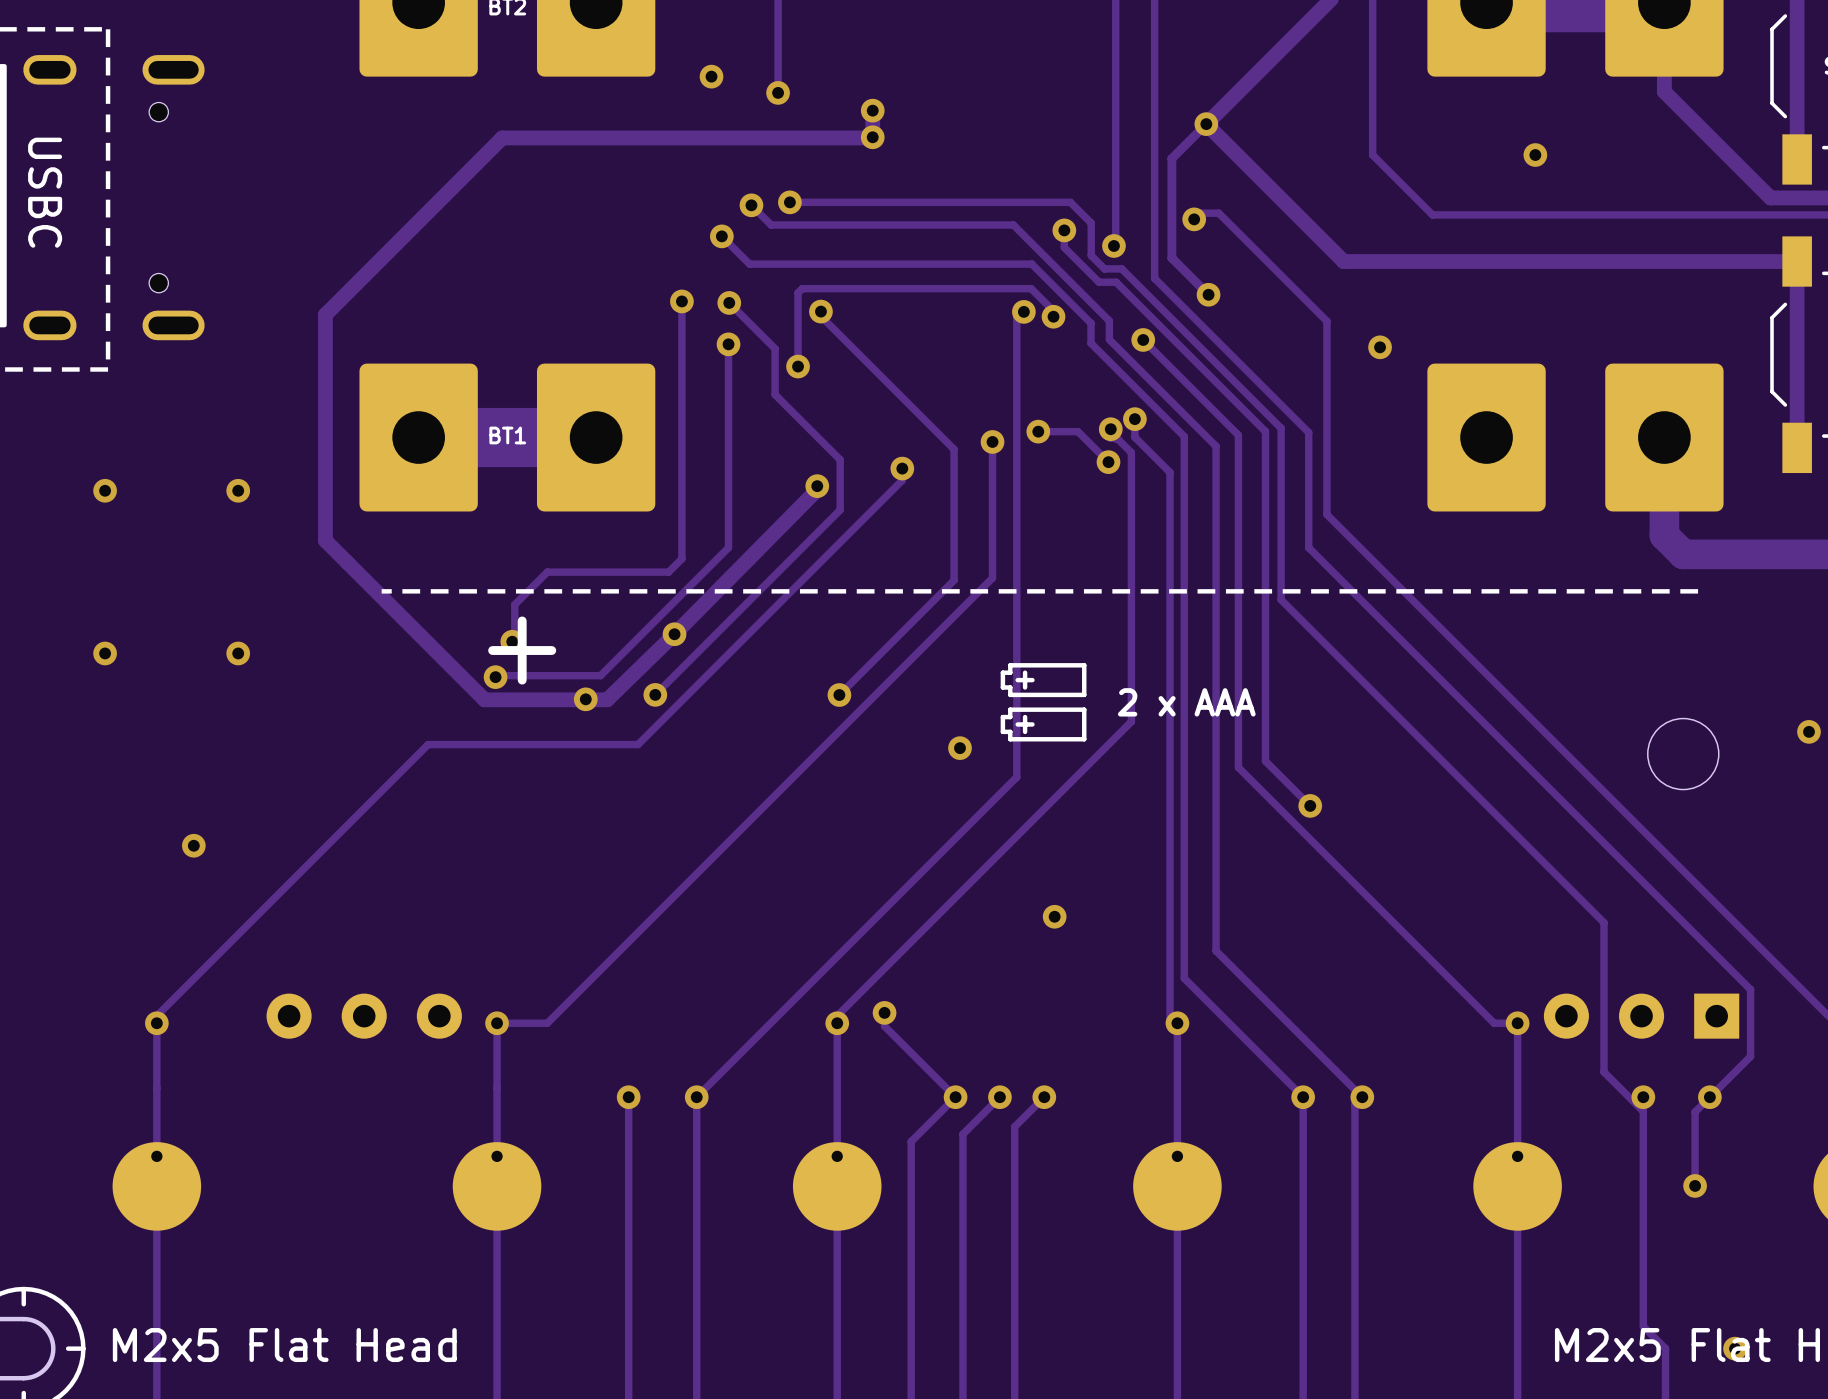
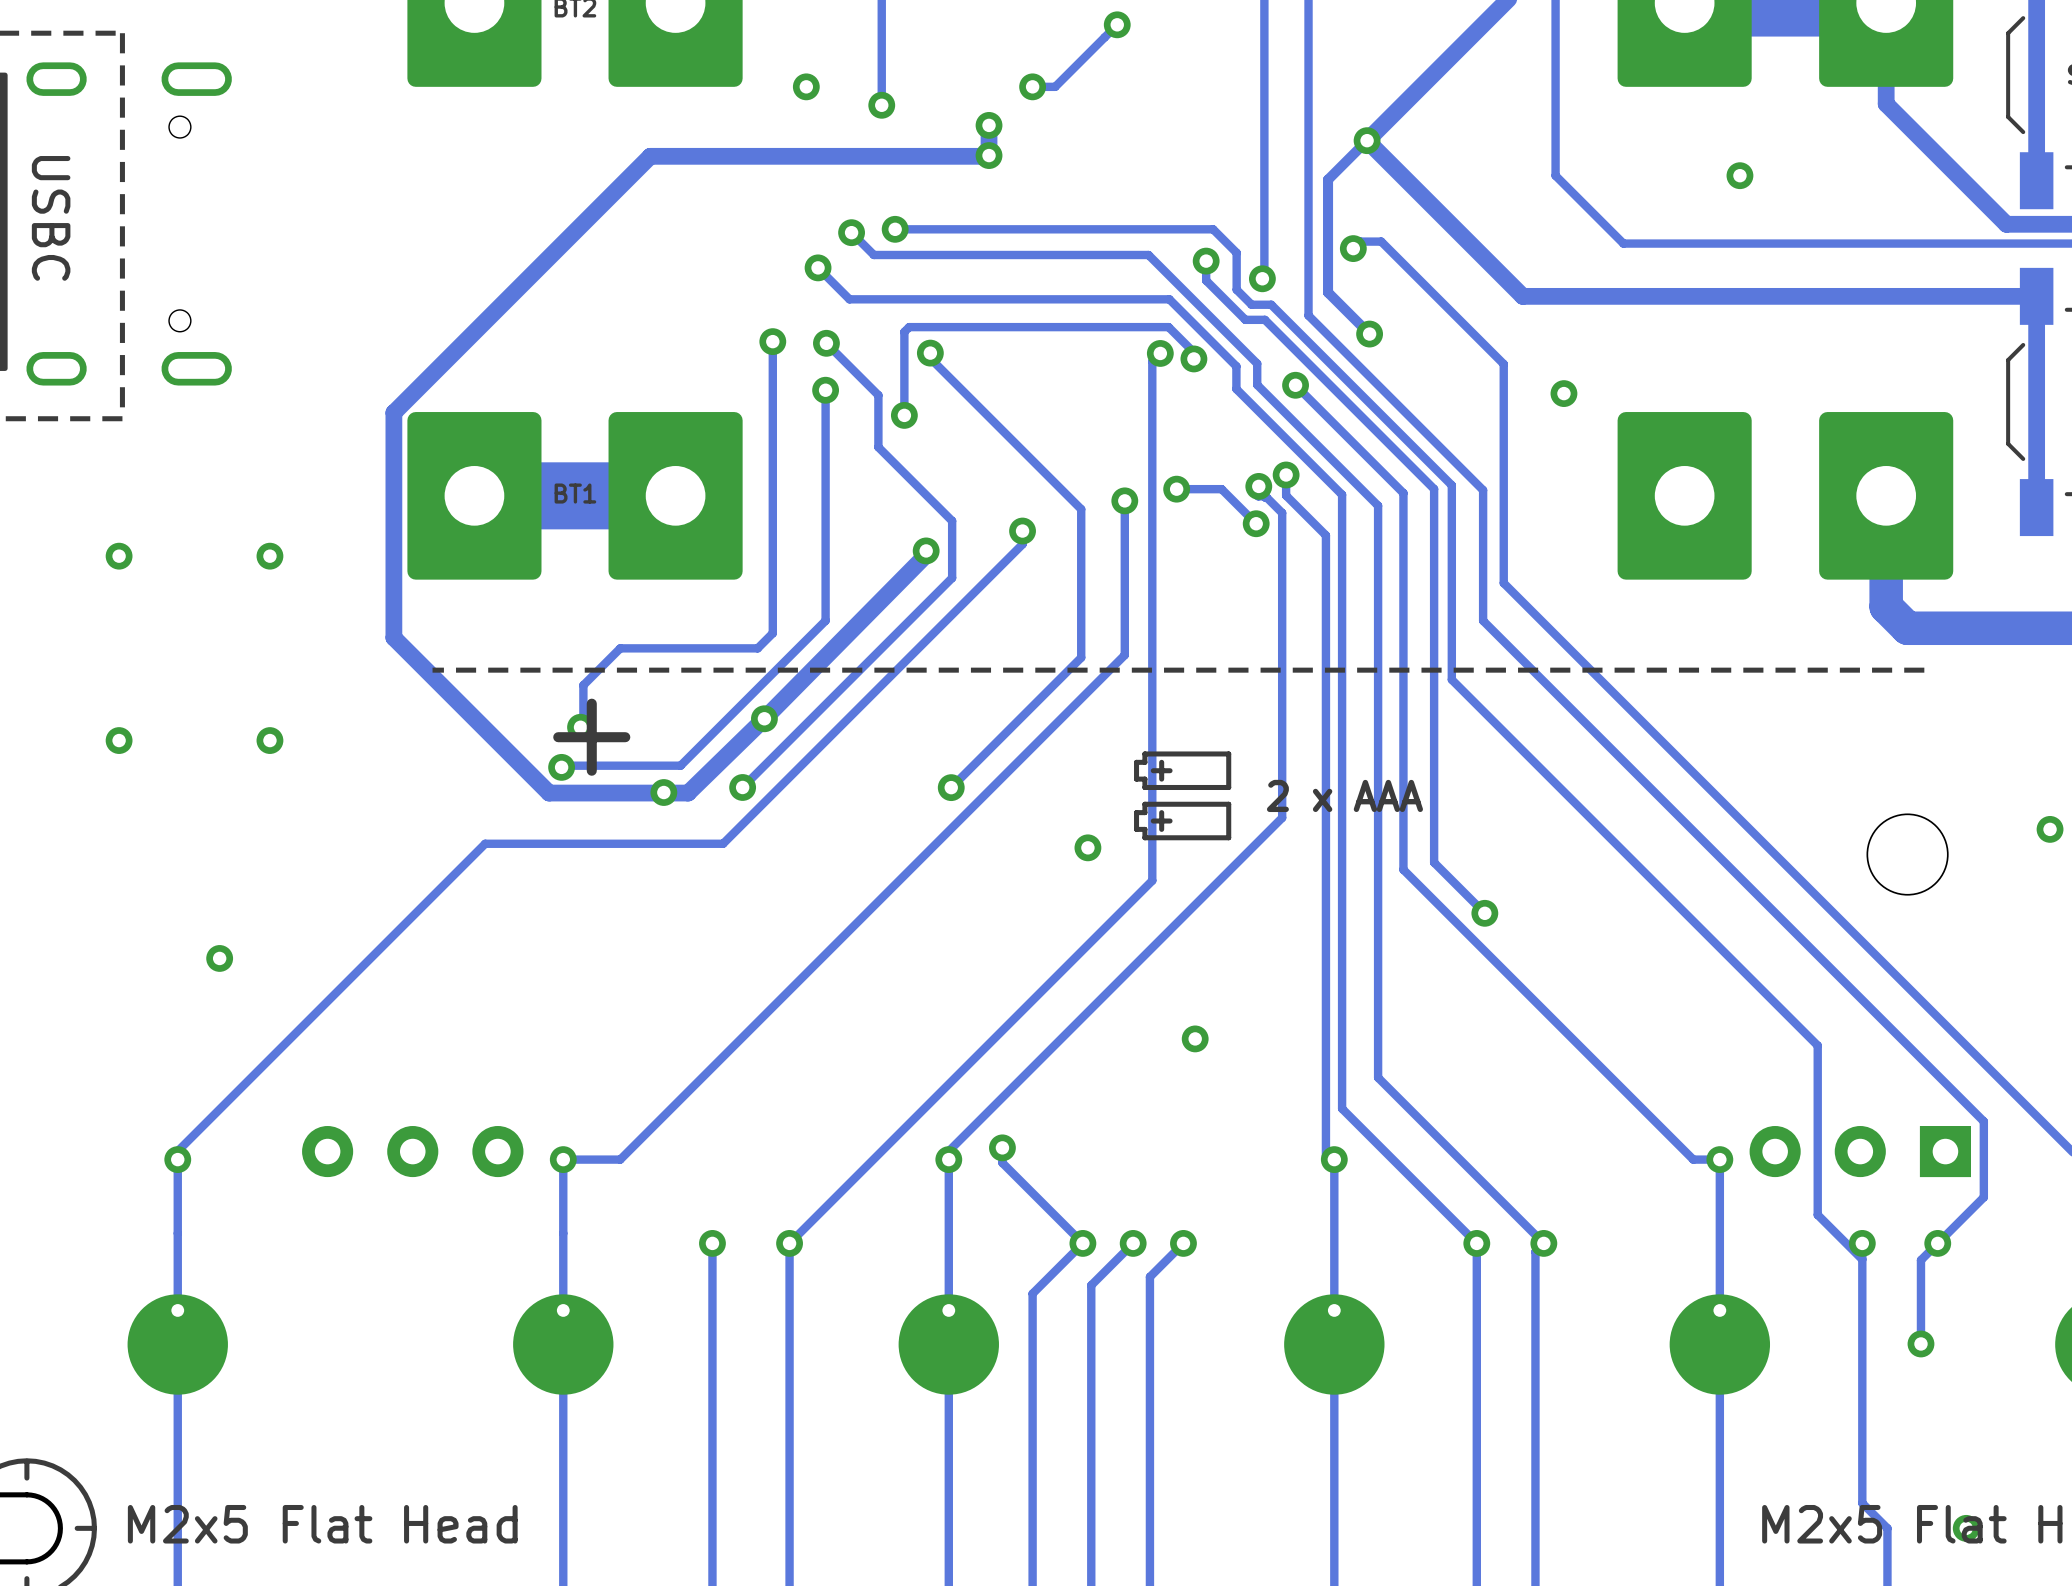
track: none -> (1117, 24) (1055, 86) (1032, 86)
via: none -> (1117, 24)
via: none -> (1032, 86)
track: (573, 137) (502, 137) (325, 314) (325, 540) (347, 562) -> (650, 156) (393, 412) (393, 637)

